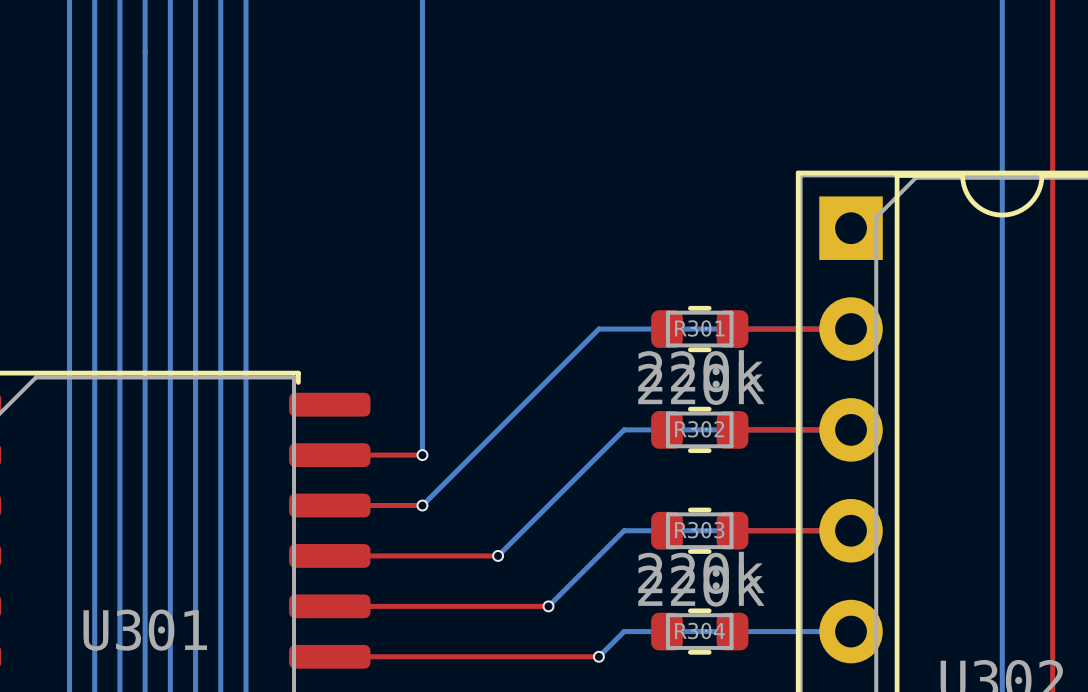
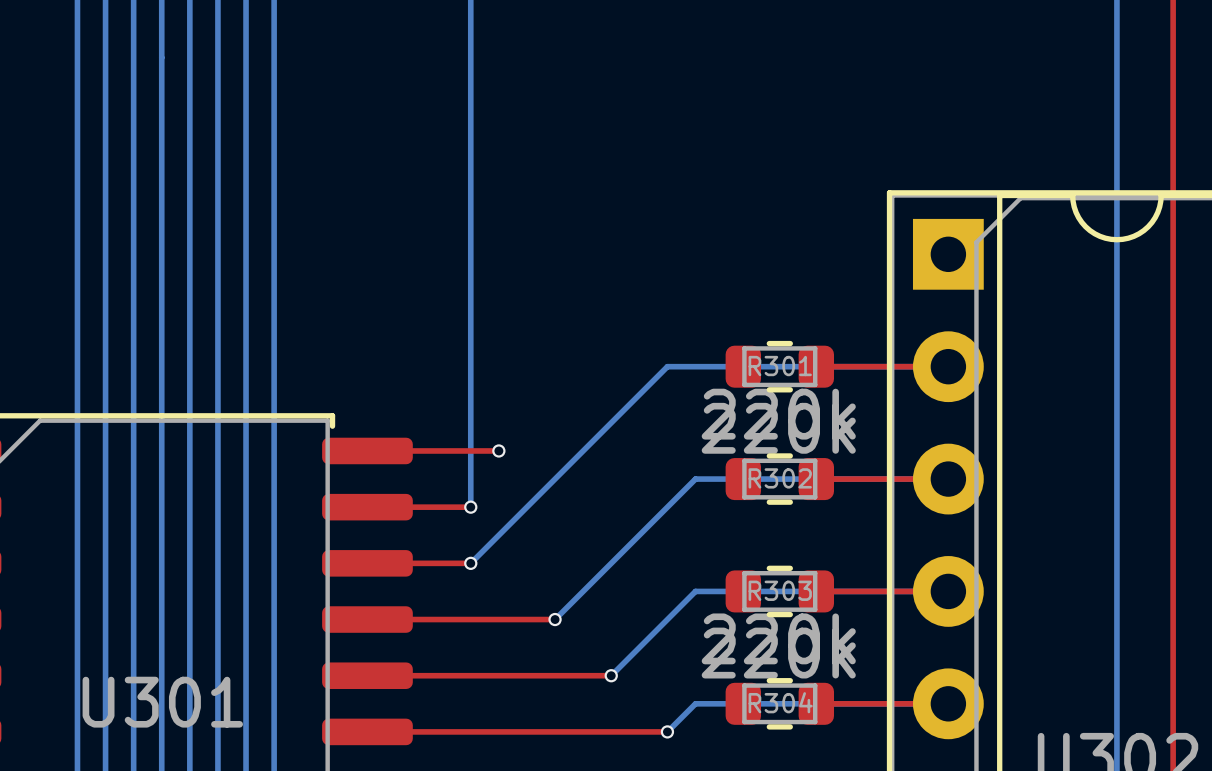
top track: none -> (367, 450) (498, 450)
via: none -> (498, 450)
top track: none -> (816, 703) (948, 703)

